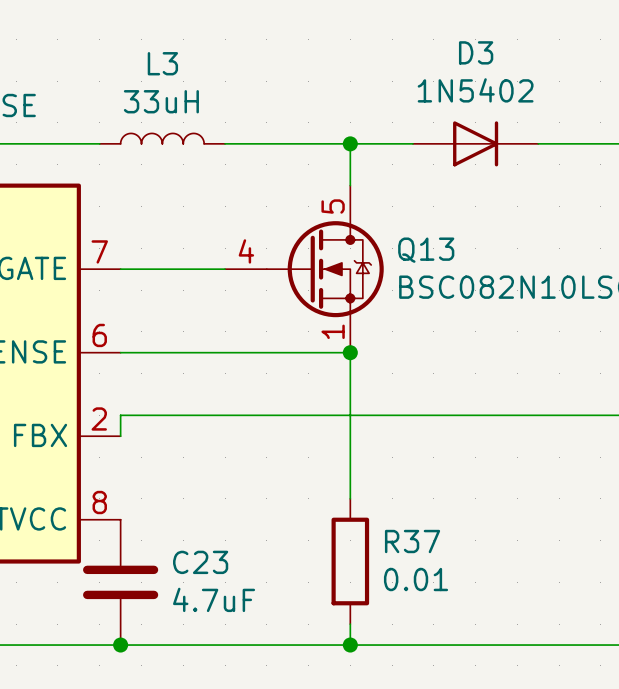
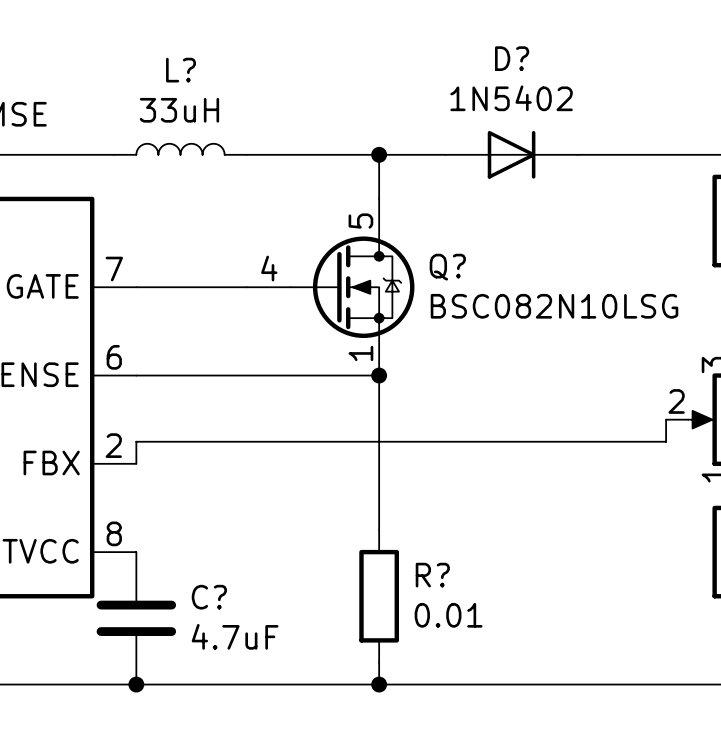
D3 name: D3 (476, 52) -> D? (512, 58)
L3 name: L3 (162, 63) -> L? (181, 70)
Q13 name: Q13 (426, 250) -> Q? (447, 267)
R37 name: R37 (412, 541) -> R? (432, 575)
C23 name: C23 (200, 562) -> C? (209, 597)

